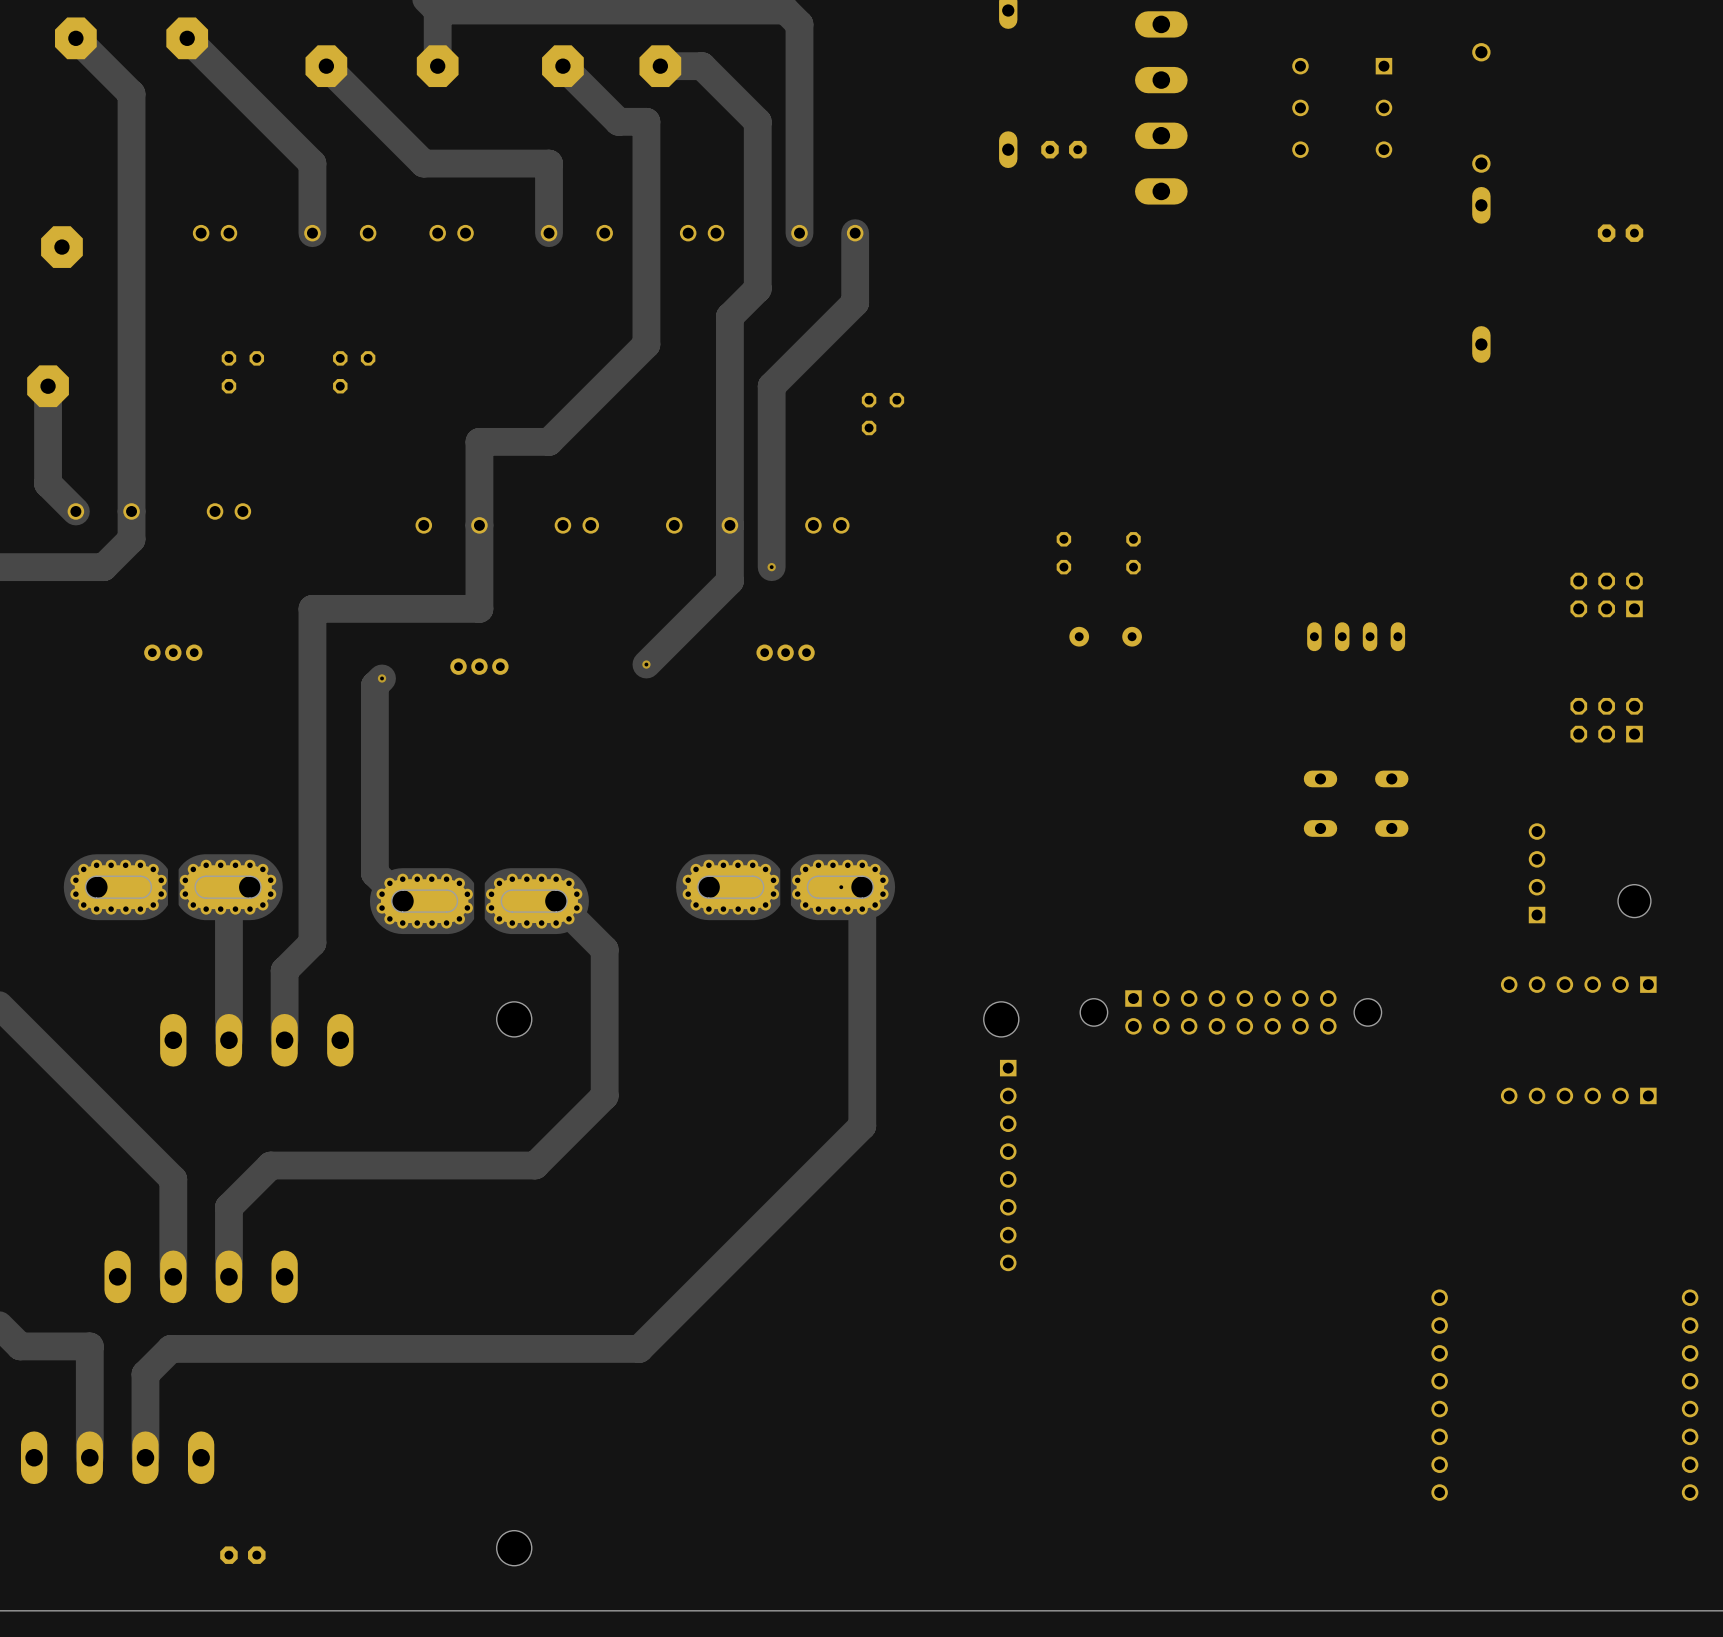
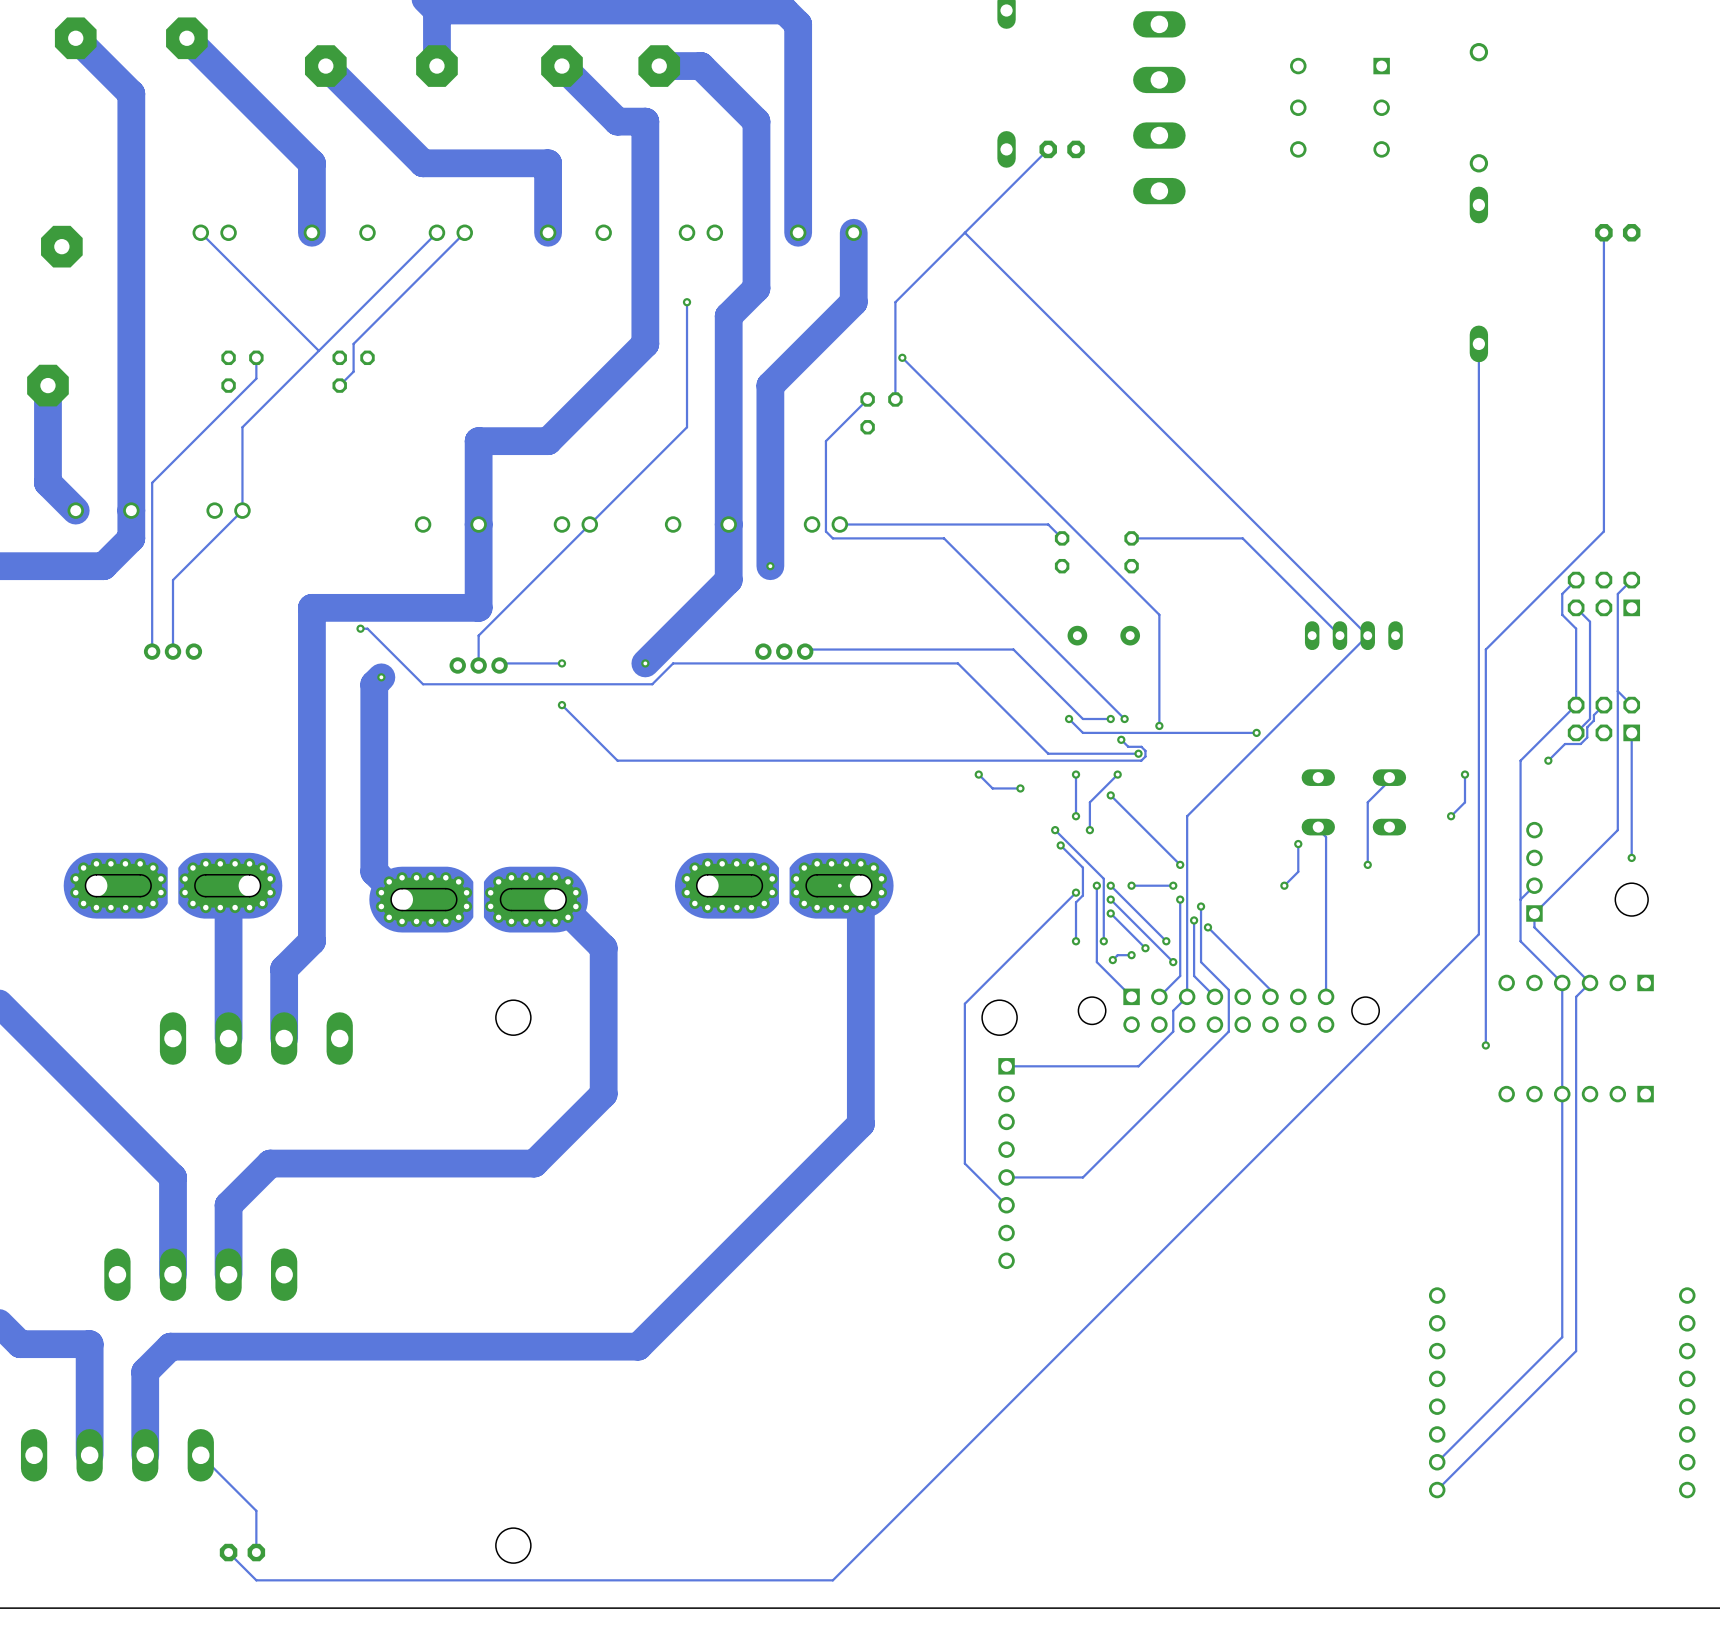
track: none -> (1048, 149) (895, 302) (895, 399)
track: none -> (200, 232) (318, 350)
track: none -> (436, 232) (242, 427) (242, 510) (173, 580) (173, 651)
track: none -> (464, 232) (353, 343) (353, 371) (339, 385)
track: none -> (964, 232) (1367, 635) (1187, 816) (1187, 996) (1173, 1010) (1173, 1031) (1138, 1066) (1006, 1066)
track: none -> (1603, 232) (1603, 531) (1485, 649) (1485, 1045)
track: none -> (687, 302) (687, 427) (478, 635) (478, 665)
via: none -> (687, 302)
track: none -> (1478, 343) (1478, 934) (832, 1580) (256, 1580) (228, 1552)
track: none -> (256, 357) (256, 378) (152, 482) (152, 651)
track: none -> (902, 357) (1159, 614) (1159, 725)
via: none -> (902, 357)
track: none -> (867, 399) (825, 441) (825, 531) (832, 538) (944, 538) (1124, 719)
track: none -> (839, 524) (1048, 524) (1062, 538)
track: none -> (1131, 538) (1242, 538) (1339, 635)
track: none -> (1576, 580) (1562, 593) (1562, 614) (1576, 628) (1576, 705) (1520, 760) (1520, 941) (1562, 982) (1562, 1337) (1437, 1462)
track: none -> (1631, 580) (1617, 593) (1617, 830) (1534, 913) (1534, 927) (1590, 982) (1576, 996) (1576, 1351) (1437, 1490)
track: none -> (1576, 607) (1590, 621) (1590, 719) (1576, 732)
track: none -> (360, 628) (367, 628) (423, 684) (652, 684) (673, 663) (957, 663) (1048, 753) (1138, 753)
via: none -> (360, 628)
track: none -> (805, 651) (812, 649) (1013, 649) (1082, 719) (1110, 719)
track: none -> (561, 663) (501, 663) (499, 665)
via: none -> (561, 663)
track: none -> (1617, 691) (1631, 705)
track: none -> (561, 705) (617, 760) (1141, 760) (1145, 756) (1145, 750) (1141, 746) (1128, 746) (1121, 739)
via: none -> (561, 705)
track: none -> (1603, 705) (1593, 715) (1593, 720) (1587, 727) (1587, 737) (1580, 744) (1565, 744) (1548, 760)
track: none -> (1069, 719) (1082, 732) (1256, 732)
via: none -> (1069, 719)
via: none -> (1110, 719)
via: none -> (1124, 719)
via: none -> (1159, 725)
via: none -> (1256, 732)
track: none -> (1631, 732) (1631, 857)
via: none -> (1121, 739)
via: none -> (1138, 753)
via: none -> (1548, 760)
track: none -> (978, 774) (992, 788) (1020, 788)
via: none -> (978, 774)
track: none -> (1076, 774) (1076, 816)
via: none -> (1076, 774)
track: none -> (1117, 774) (1089, 802) (1089, 830)
via: none -> (1117, 774)
track: none -> (1464, 774) (1464, 802) (1451, 816)
via: none -> (1464, 774)
track: none -> (1389, 777) (1388, 781) (1367, 802) (1367, 864)
via: none -> (1020, 788)
track: none -> (1110, 795) (1180, 864)
via: none -> (1110, 795)
via: none -> (1076, 816)
via: none -> (1451, 816)
track: none -> (1318, 827) (1326, 837) (1326, 996)
track: none -> (1055, 830) (1103, 878) (1103, 941)
via: none -> (1055, 830)
via: none -> (1089, 830)
track: none -> (1298, 844) (1298, 871) (1284, 885)
via: none -> (1298, 844)
track: none -> (1060, 845) (1082, 867) (1082, 895) (1076, 902) (1076, 941)
via: none -> (1060, 845)
via: none -> (1631, 857)
via: none -> (1180, 864)
via: none -> (1367, 864)
track: none -> (1096, 885) (1096, 962) (1131, 996)
via: none -> (1096, 885)
track: none -> (1110, 885) (1166, 941)
via: none -> (1110, 885)
via: none -> (1131, 885)
track: none -> (1173, 885) (1131, 885)
via: none -> (1173, 885)
via: none -> (1284, 885)
track: none -> (1534, 885) (1520, 899)
track: none -> (1076, 892) (964, 1003) (964, 1163) (1006, 1205)
via: none -> (1076, 892)
track: none -> (1110, 899) (1173, 962)
via: none -> (1110, 899)
track: none -> (1180, 899) (1180, 976) (1159, 996)
via: none -> (1180, 899)
track: none -> (1201, 906) (1201, 962) (1228, 989) (1228, 1031) (1082, 1177) (1006, 1177)
via: none -> (1201, 906)
track: none -> (1110, 913) (1145, 948)
via: none -> (1110, 913)
track: none -> (1194, 920) (1194, 976) (1214, 996)
via: none -> (1194, 920)
track: none -> (1207, 927) (1270, 989) (1270, 996)
via: none -> (1207, 927)
via: none -> (1076, 941)
via: none -> (1103, 941)
via: none -> (1166, 941)
via: none -> (1145, 948)
track: none -> (1131, 955) (1117, 955) (1112, 960)
via: none -> (1131, 955)
via: none -> (1112, 960)
via: none -> (1173, 962)
via: none -> (1485, 1045)
track: none -> (200, 1455) (256, 1510) (256, 1552)

